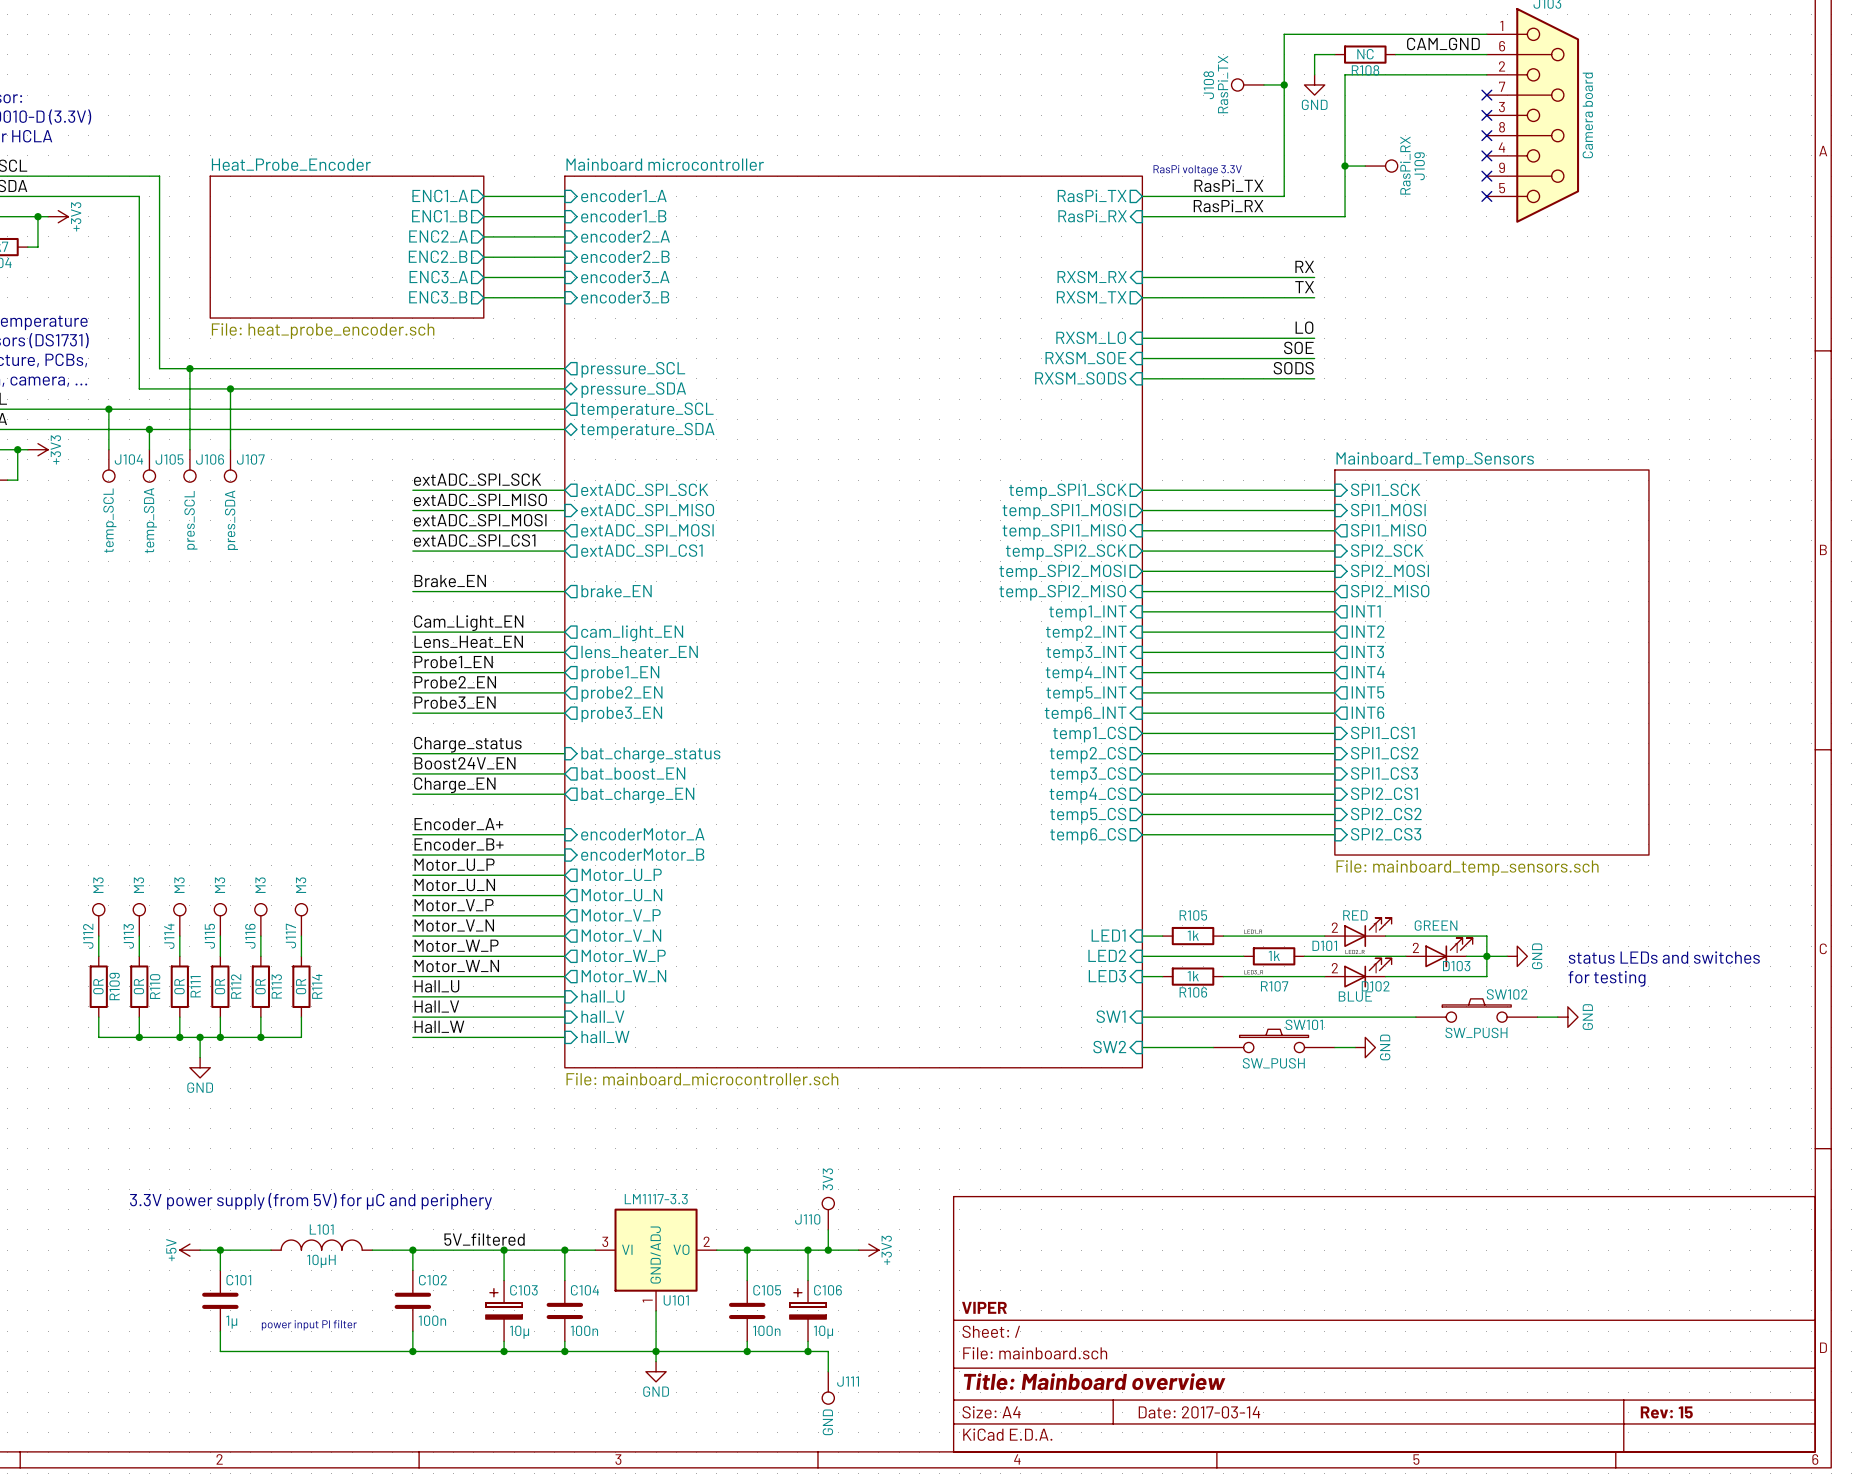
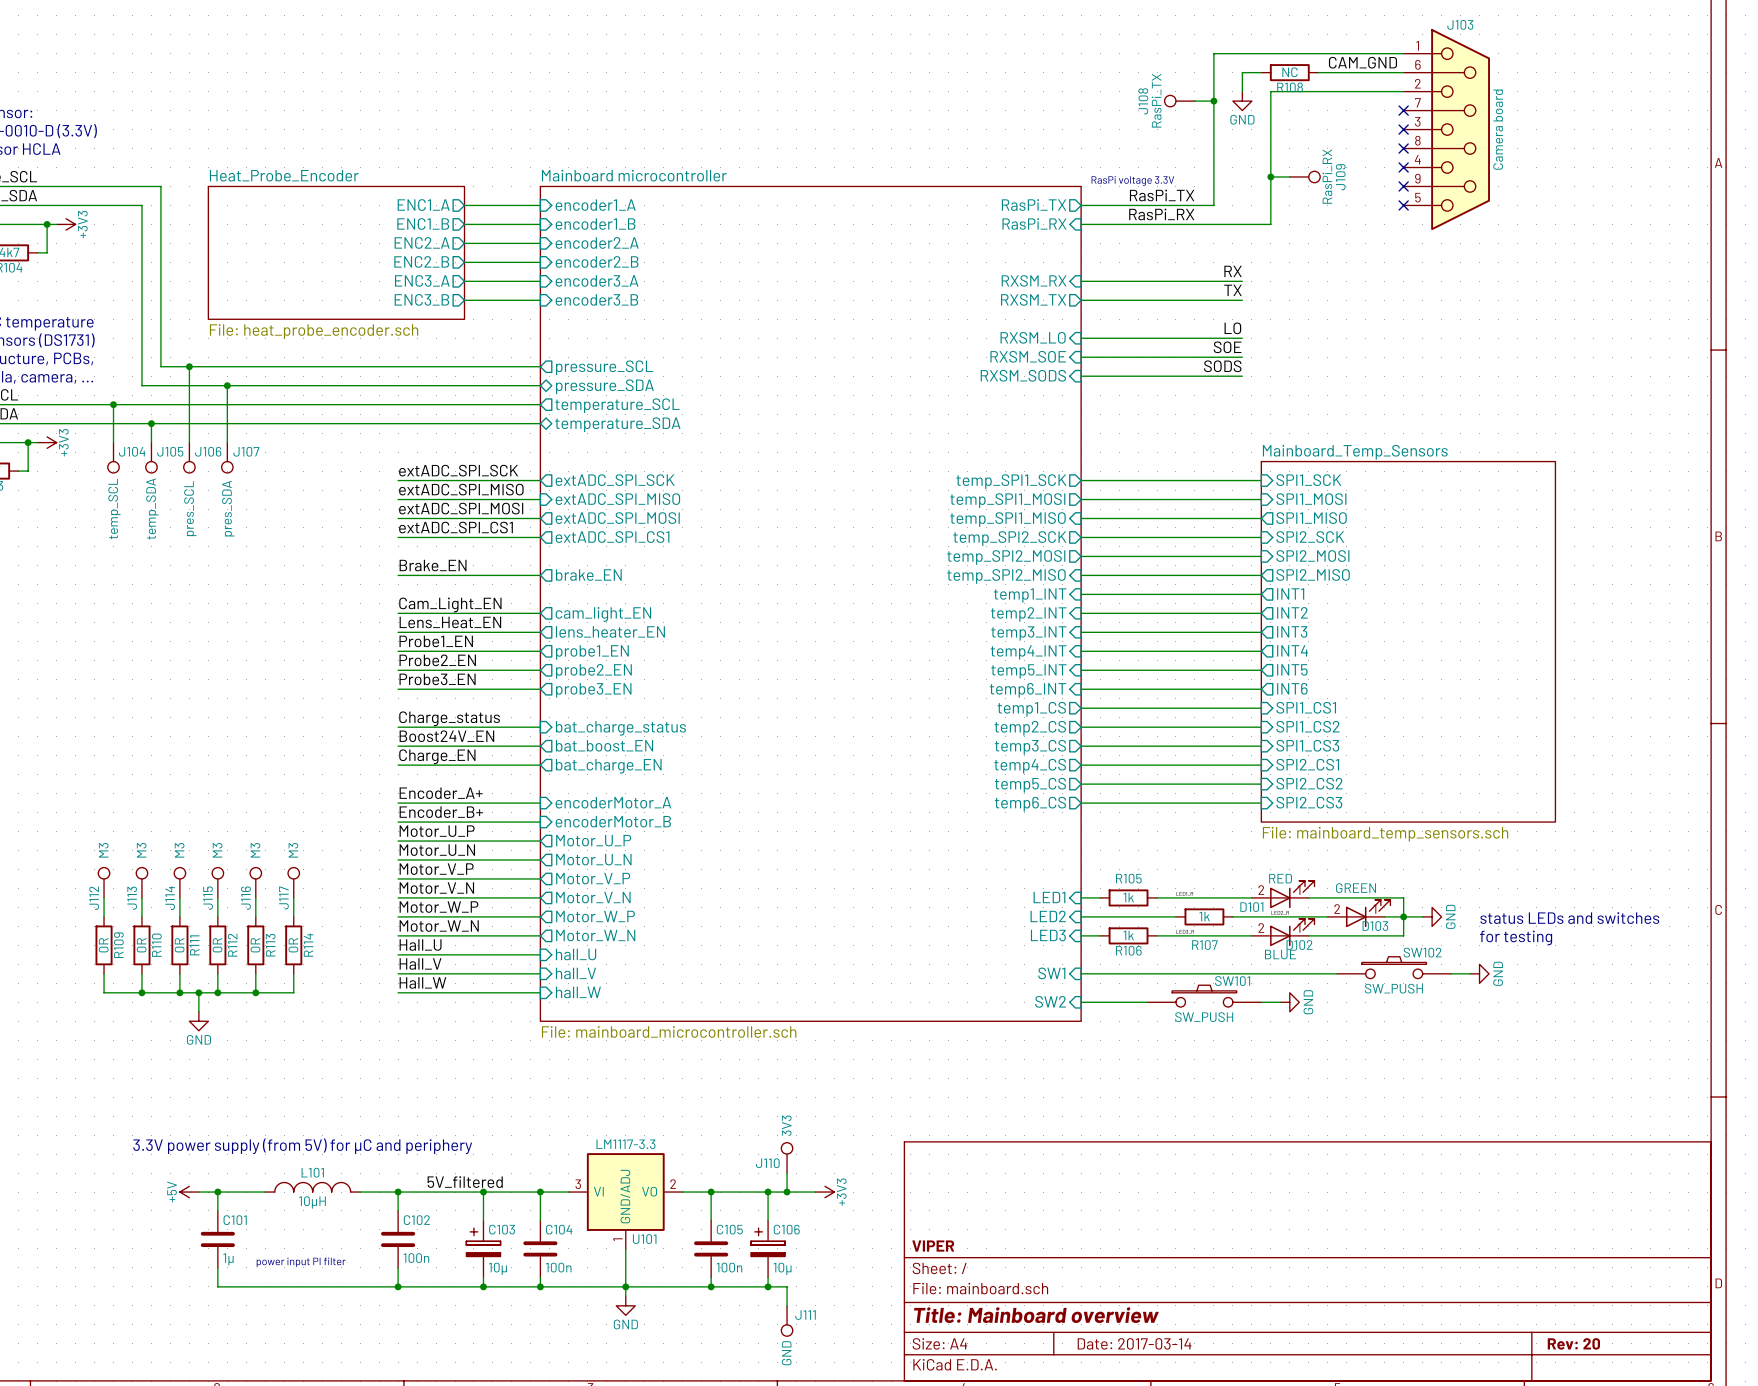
title block: Rev: 15 (1666, 1412) -> Rev: 20 (1573, 1343)

